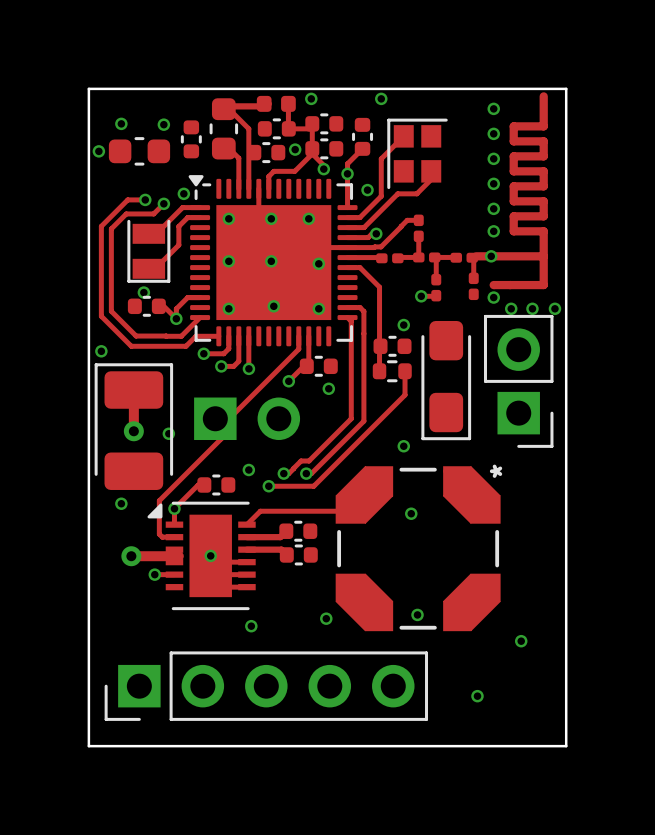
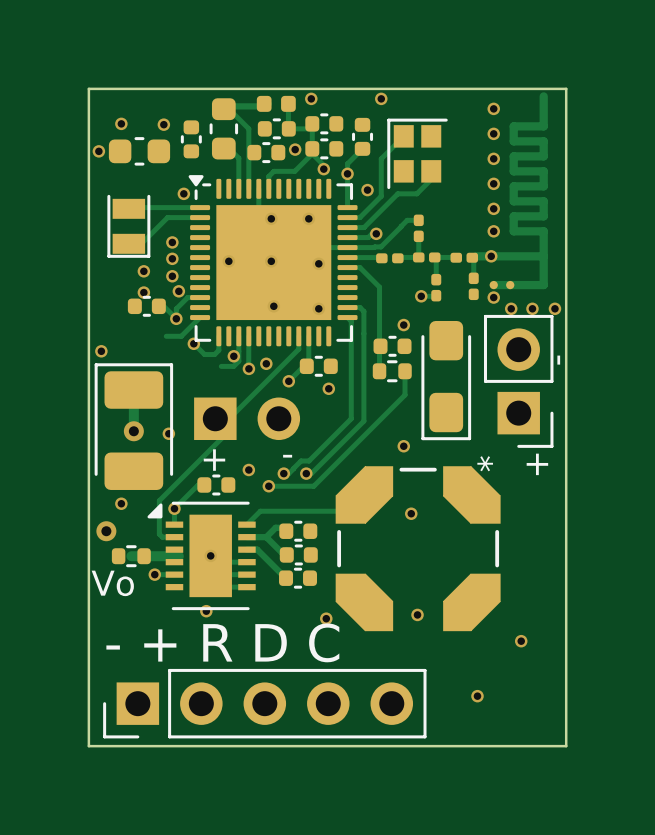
track: (145, 199) (127, 199) (101, 226) (101, 316) (131, 346) (185, 346) (195, 336) (218, 336) -> (193, 343) (204, 354) (214, 354) (218, 350) (218, 336)
via: (145, 199) -> none
track: (163, 203) (153, 213) (126, 213) (111, 228) (111, 311) (136, 336) (166, 336) -> none
via: (163, 203) -> none
track: (182, 207) (153, 236) (146, 236) -> (182, 207) (128, 208)
track: (187, 217) (178, 226) (178, 245) (152, 271) (146, 271) -> (187, 217) (167, 217) (141, 243)
via: (228, 218) -> none
via: none -> (172, 242)
part position: (148, 251) -> (128, 226)
via: none -> (172, 258)
via: none -> (143, 271)
via: none -> (172, 276)
via: none -> (178, 291)
via: (228, 308) -> none
track: (228, 336) (228, 348) (223, 353) (203, 353) -> none
text: none -> - (558, 360)
via position: (203, 353) -> (193, 343)
via: none -> (266, 363)
via position: (221, 366) -> (233, 356)
text: none -> - (287, 456)
text: none -> + (214, 460)
text: none -> + (537, 464)
part footprint: [335, 466, 501, 632] -> [335, 466, 501, 632]
track: none -> (284, 527) (275, 527) (266, 537) (282, 553) (286, 553) (286, 549)
track: (286, 531) (280, 537) (266, 537) -> none
track: (257, 549) (281, 549) (286, 554) -> (257, 549) (281, 574) (286, 574)
part: none -> (131, 556)
via position: (131, 556) -> (106, 531)
part: none -> (298, 578)
text: none -> Vo (112, 583)
via position: (251, 626) -> (206, 611)
text: none -> - + R D C (222, 642)
part position: (266, 686) -> (264, 703)

